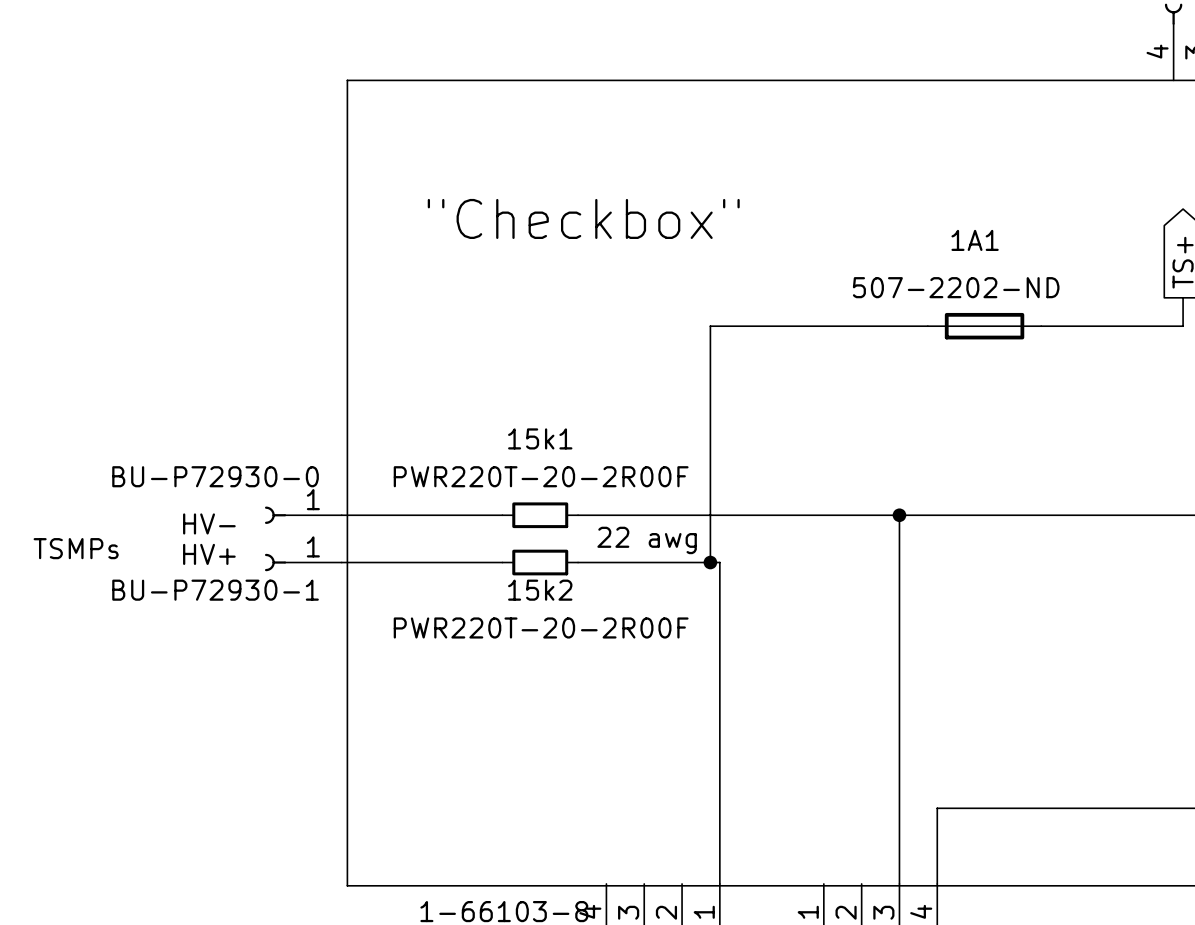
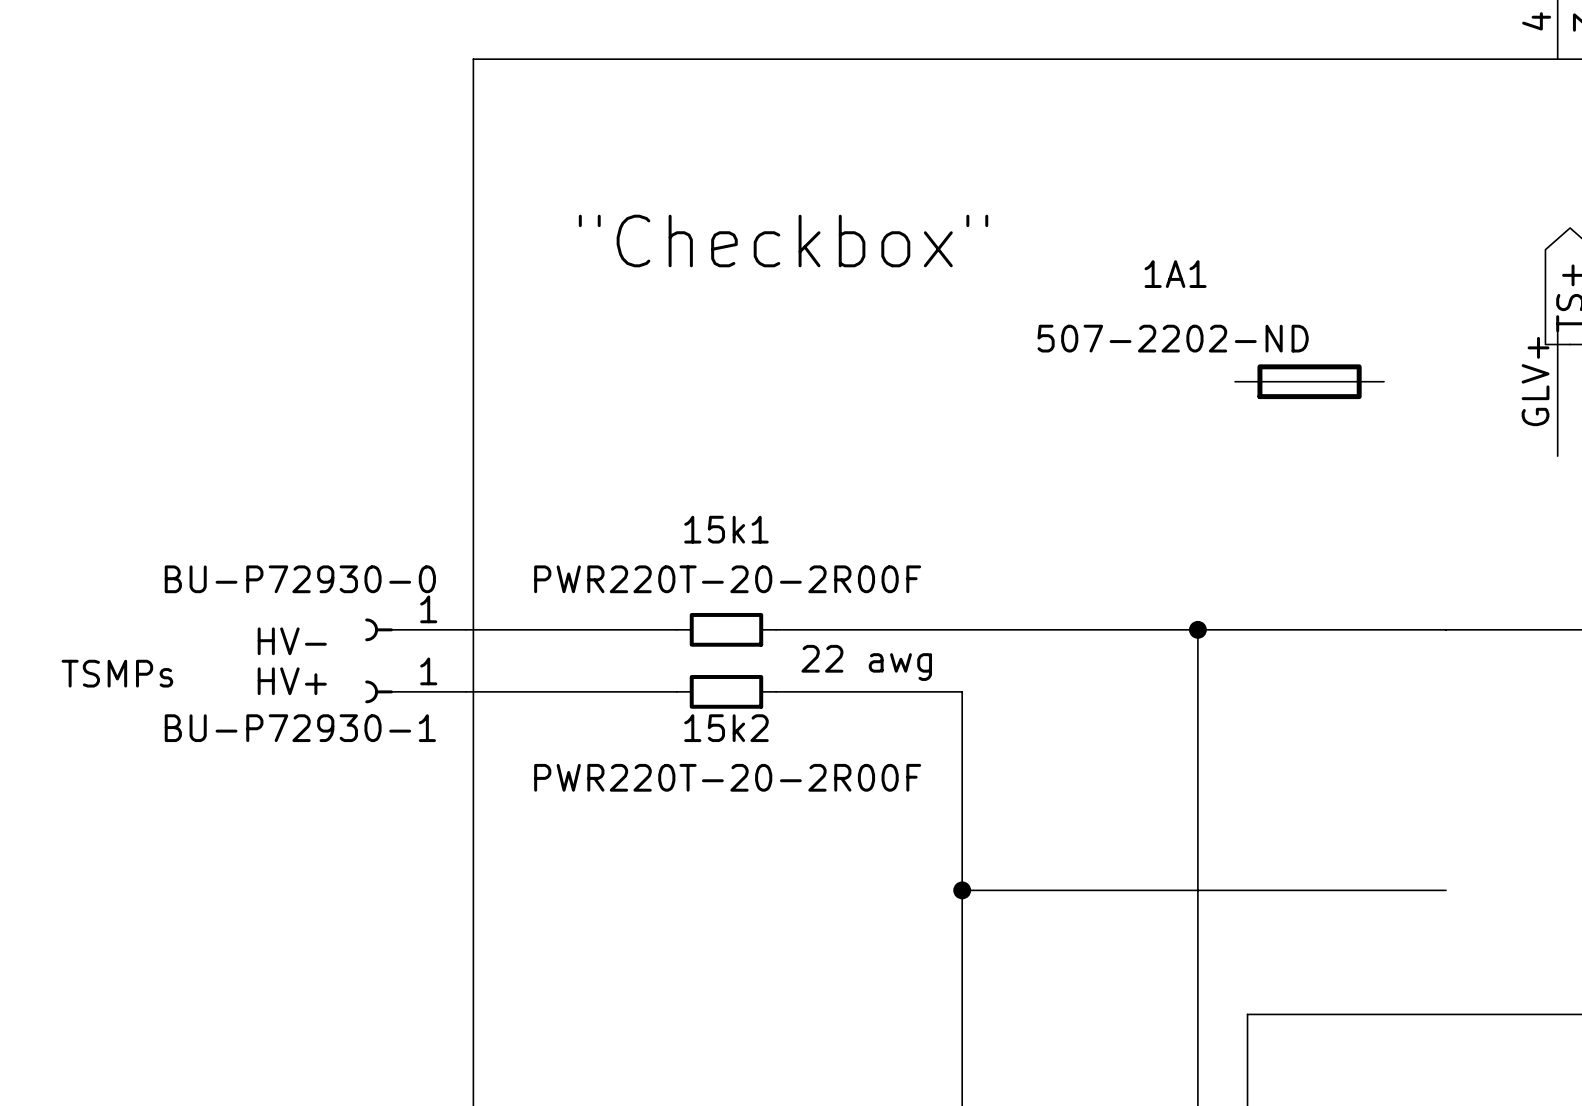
1A1 name position: 1A1 (975, 240) -> 1A1 (1175, 274)
1A1 value position: 507-2202-ND (956, 287) -> 507-2202-ND (1173, 338)
wire: none -> (1557, 332) (1557, 456)
wire: (1183, 297) (1183, 326) (1041, 326) -> none
wire: (927, 326) (710, 326) (710, 562) -> none
label: none -> GLV+ (1535, 381)
junction: (710, 562) -> none
wire: none -> (962, 890) (1446, 890)
junction: none -> (962, 890)

